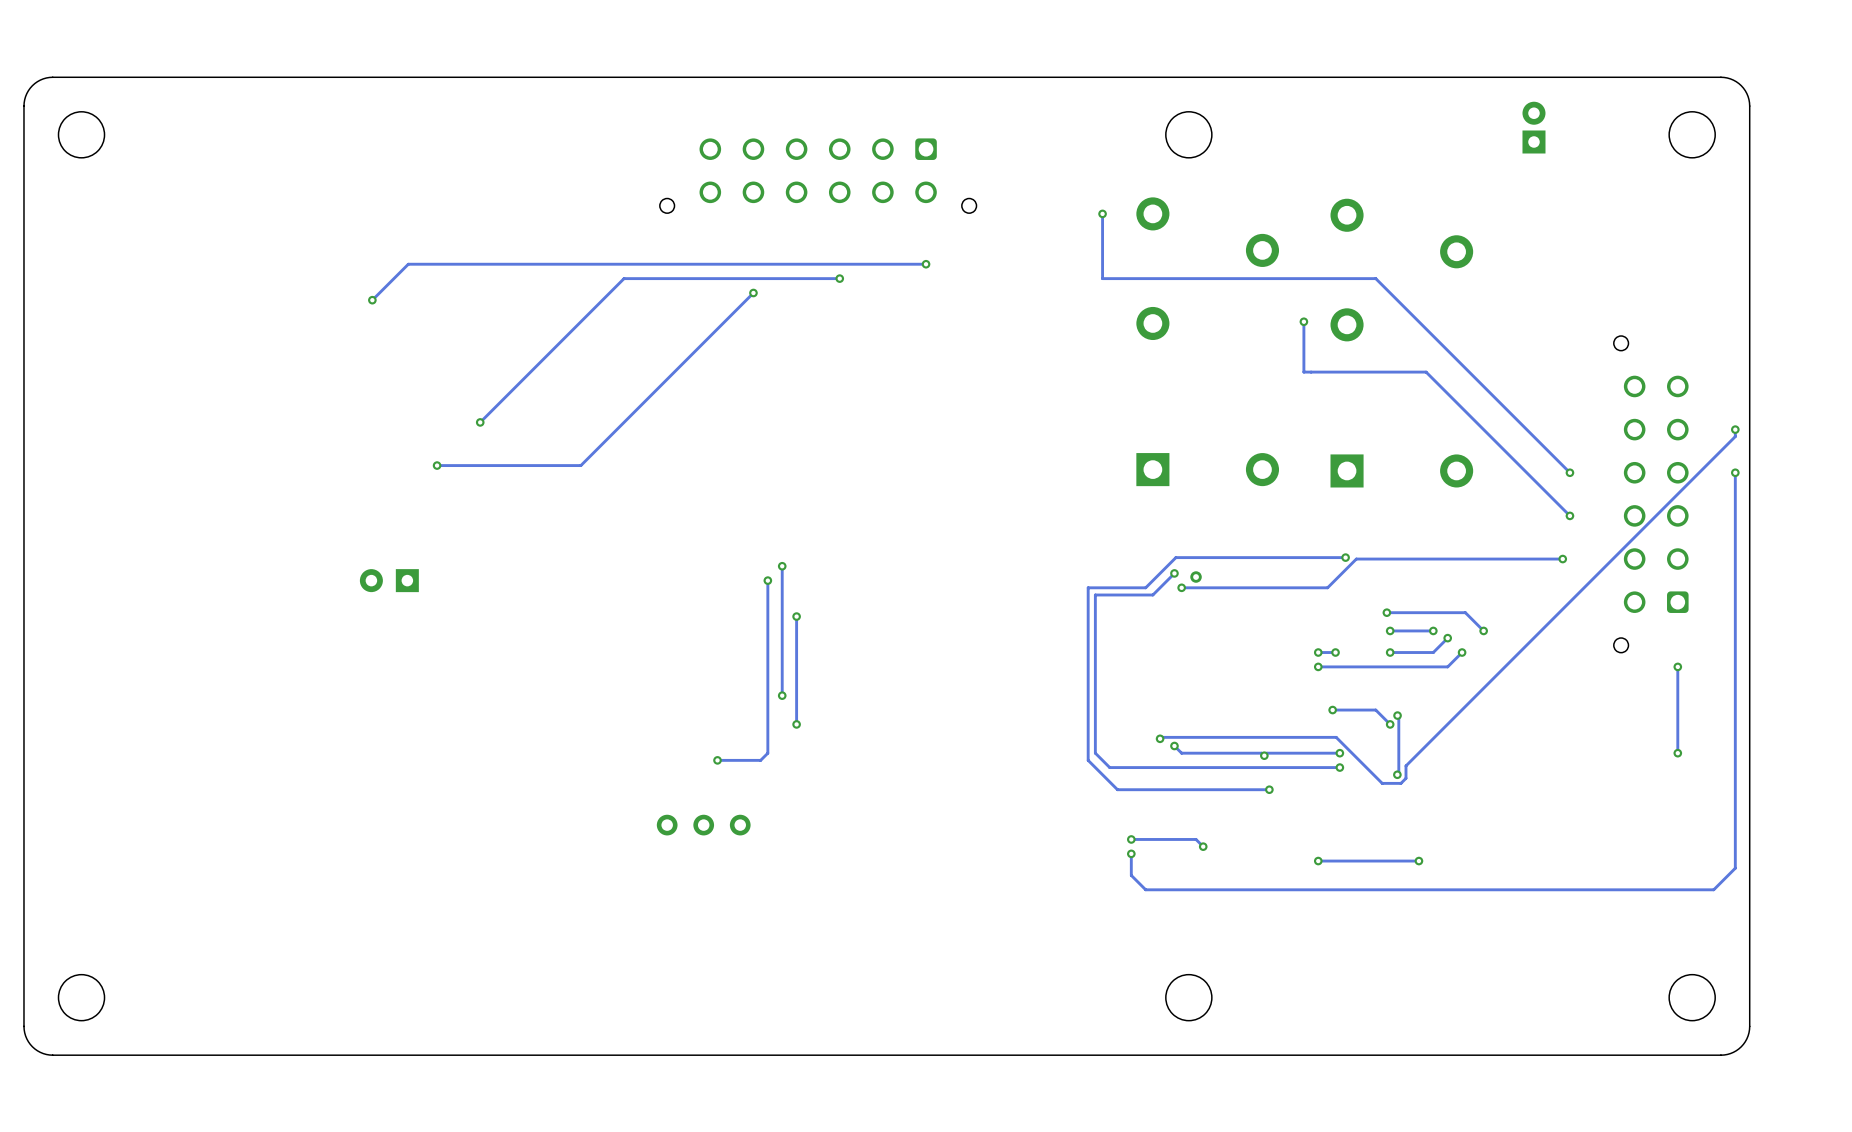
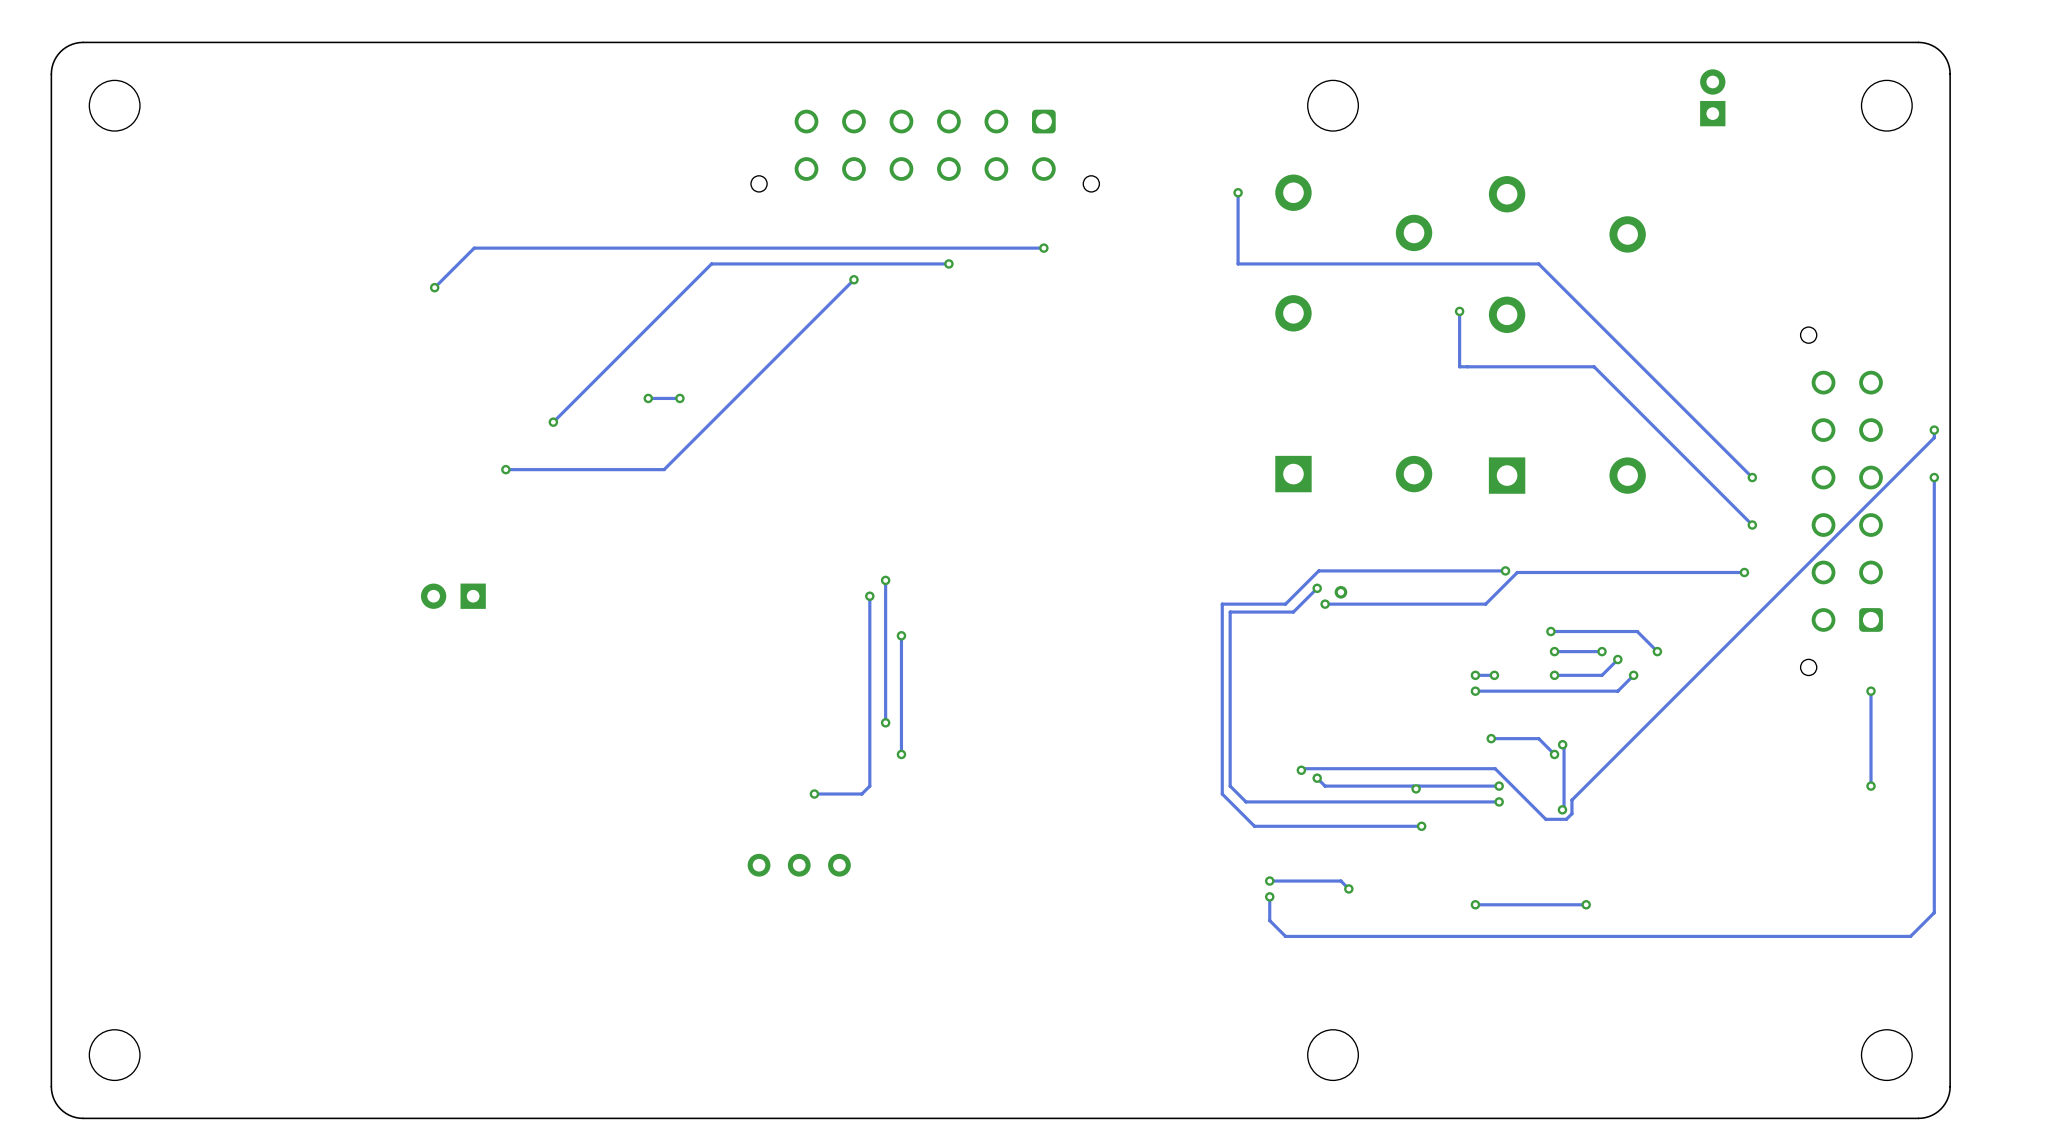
via: none -> (648, 398)
track: none -> (679, 398) (648, 398)
via: none -> (679, 398)

